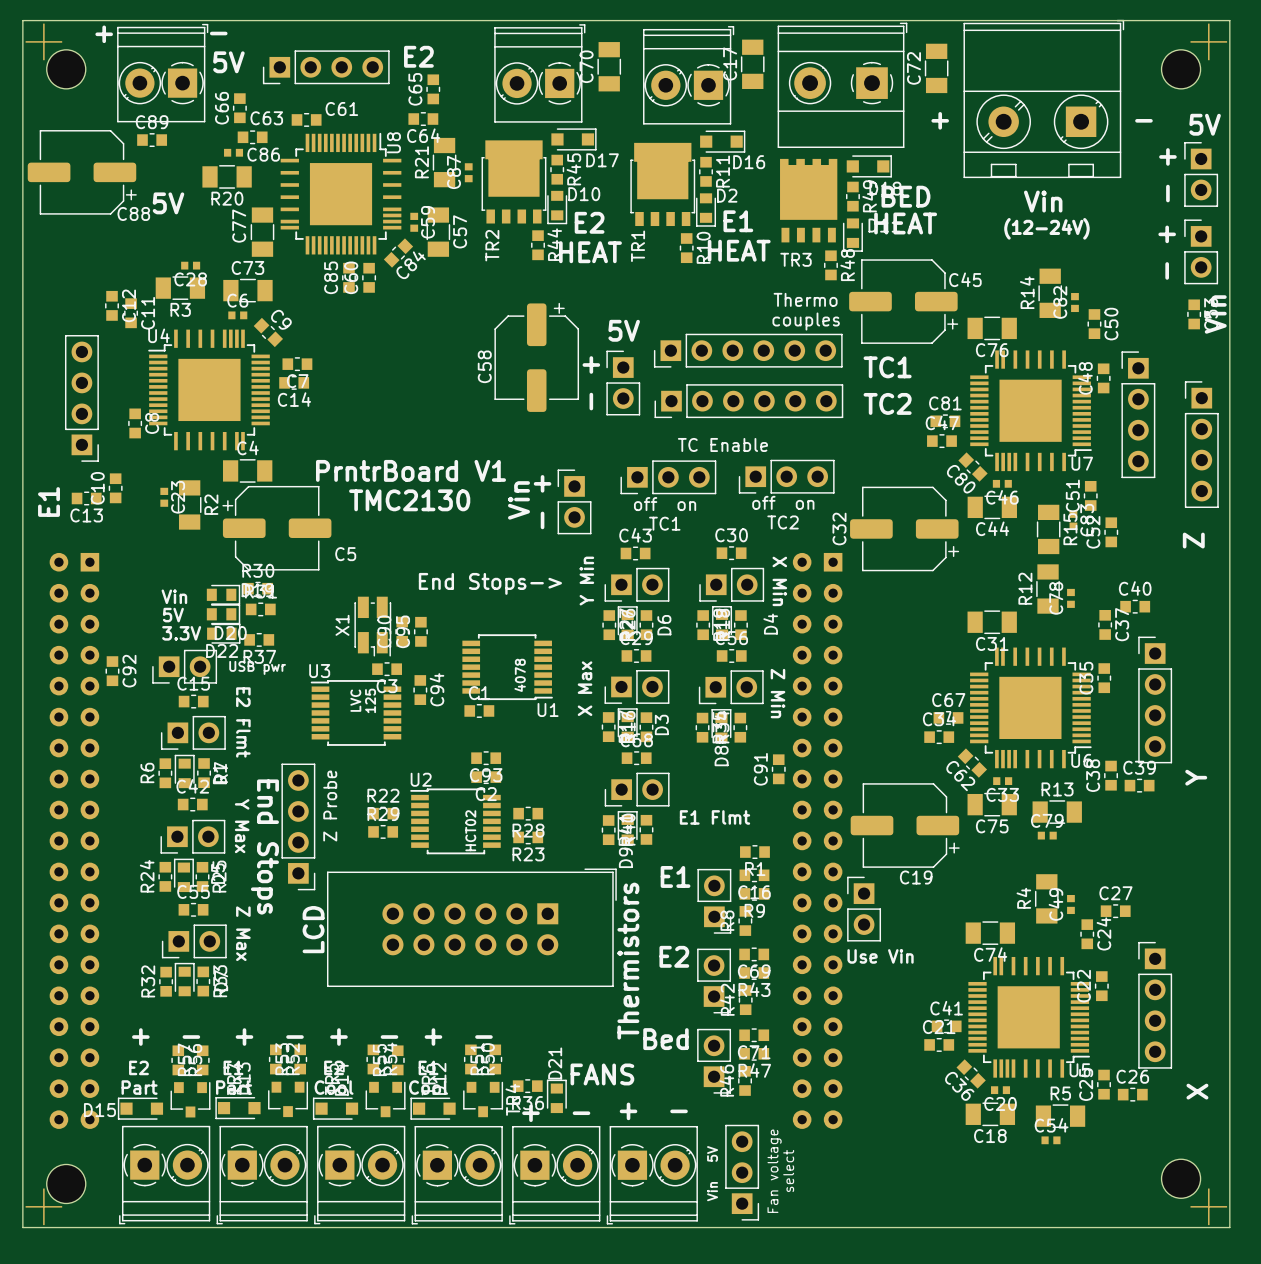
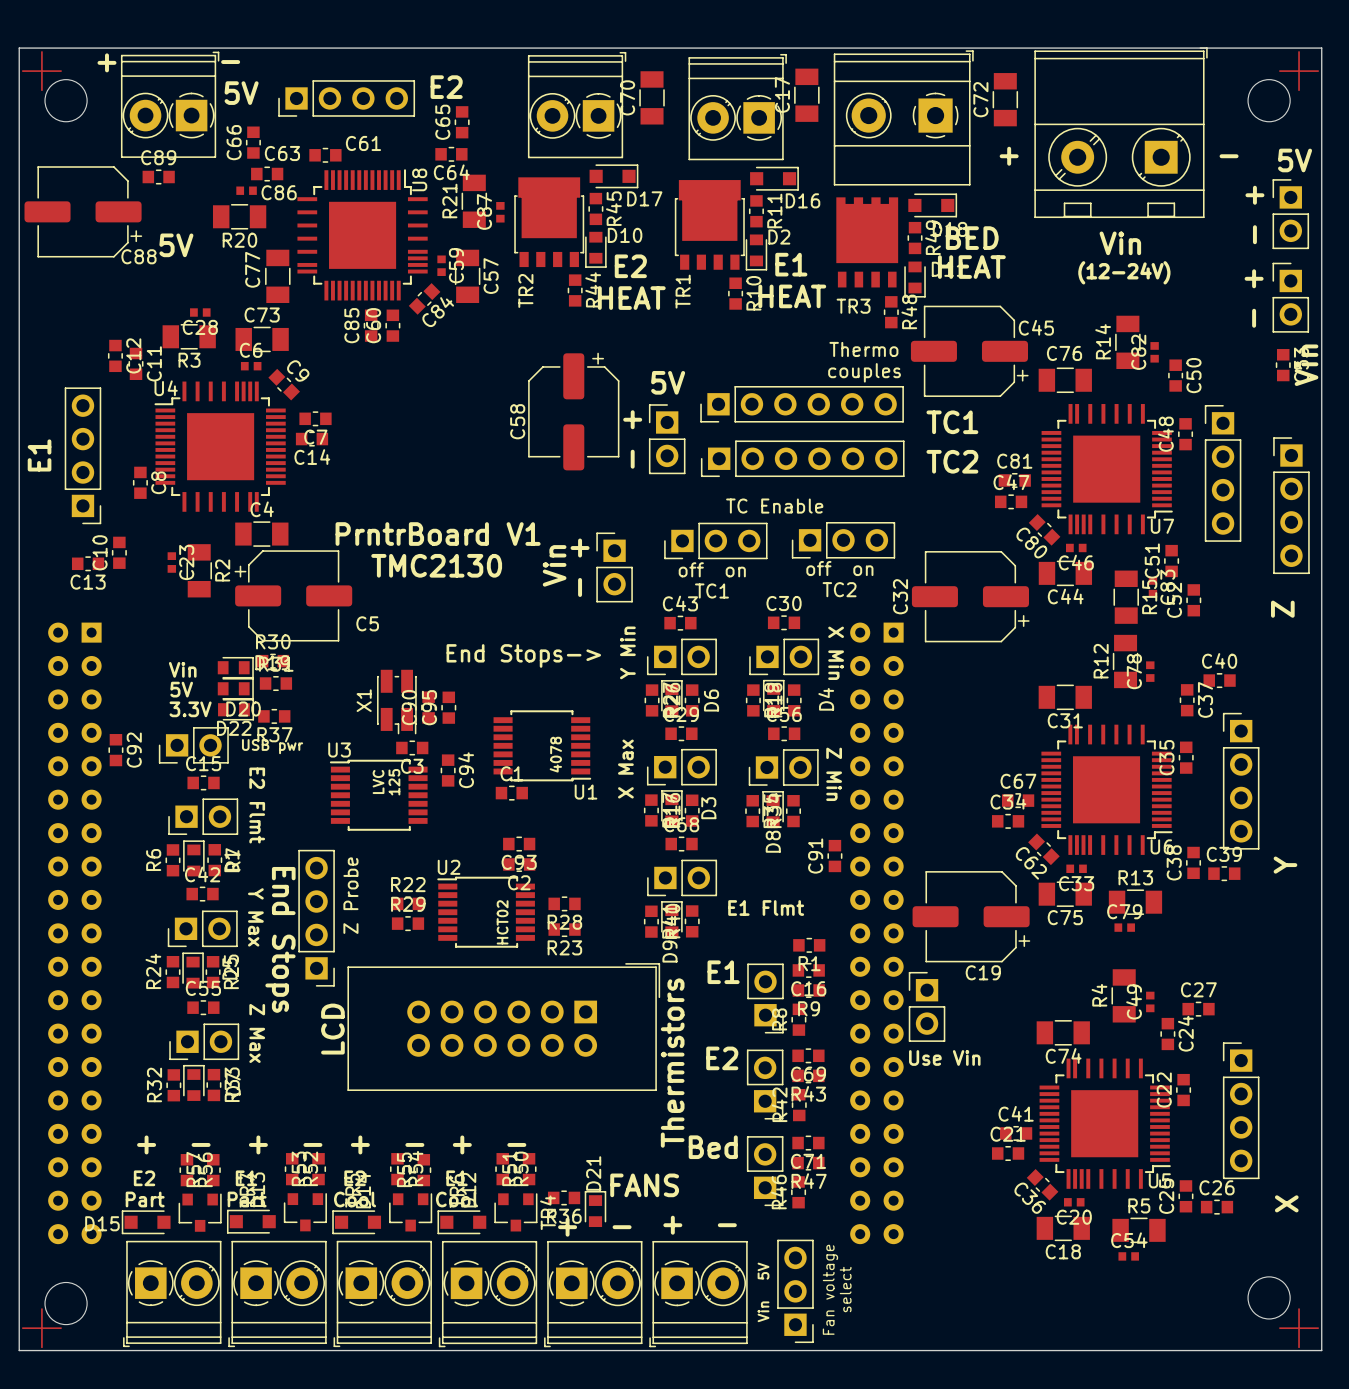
C76 name position: C76 (992, 350) -> C76 (1064, 353)
text position: E1 (49, 502) -> E1 (39, 455)

